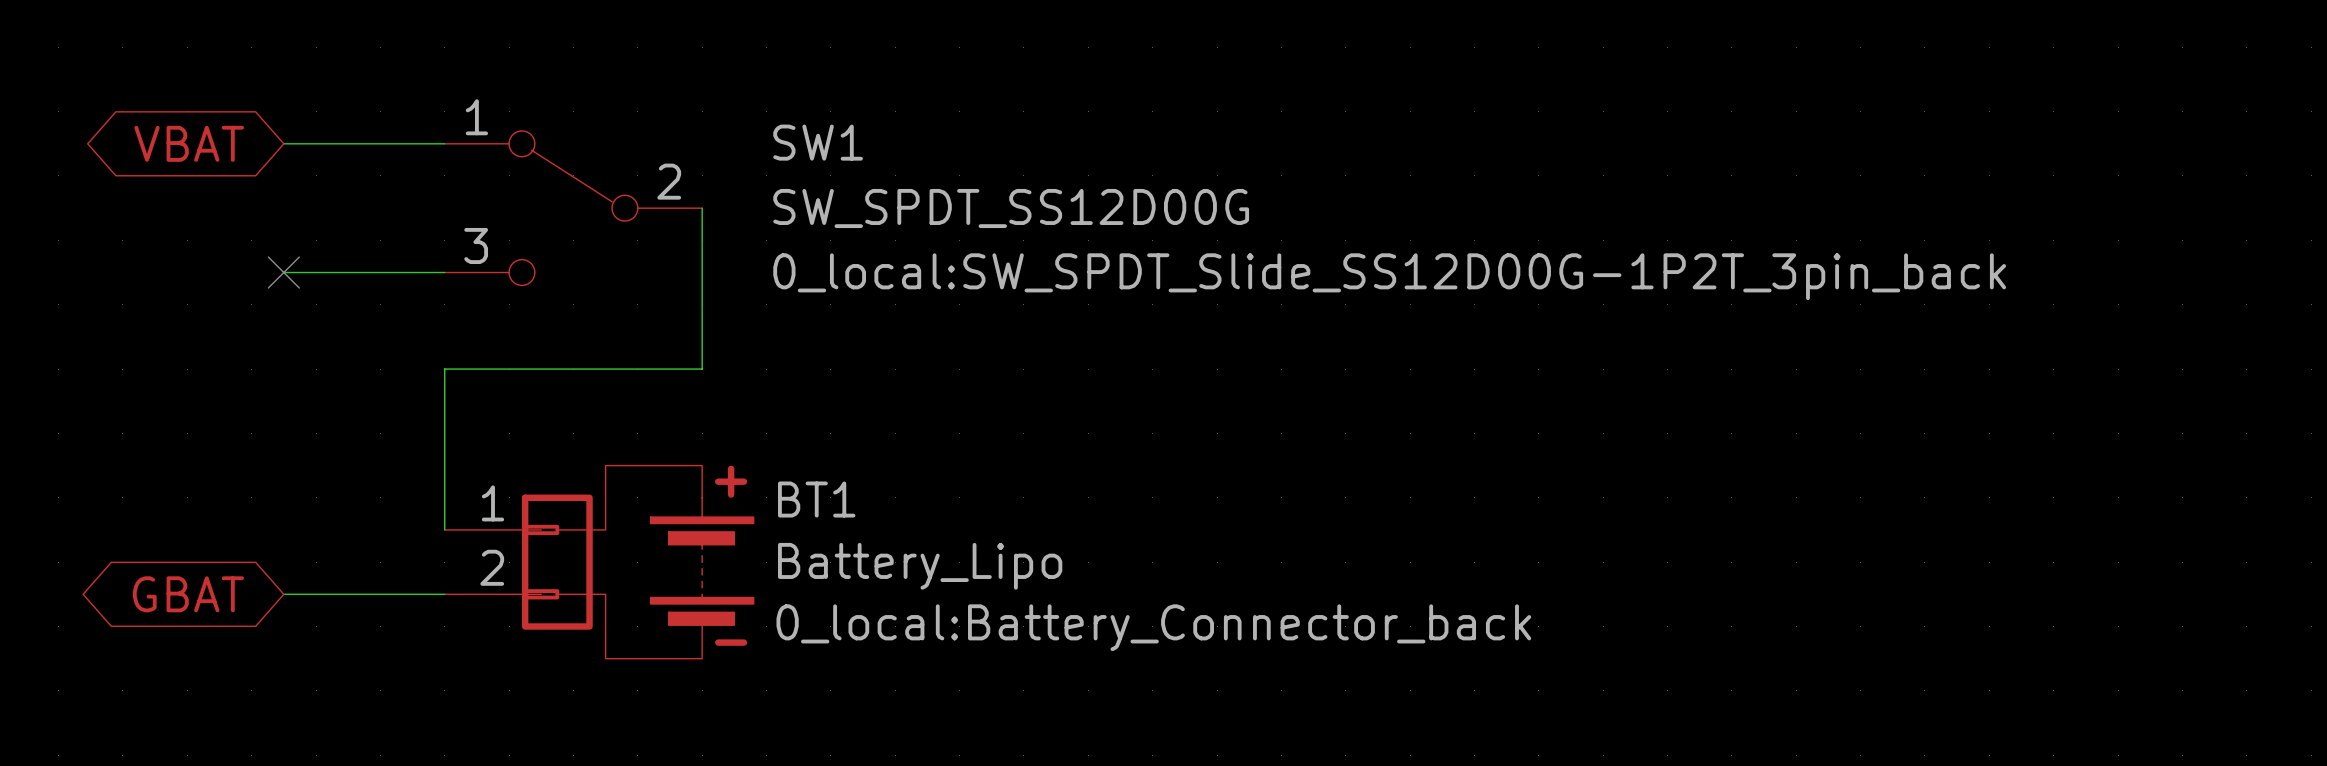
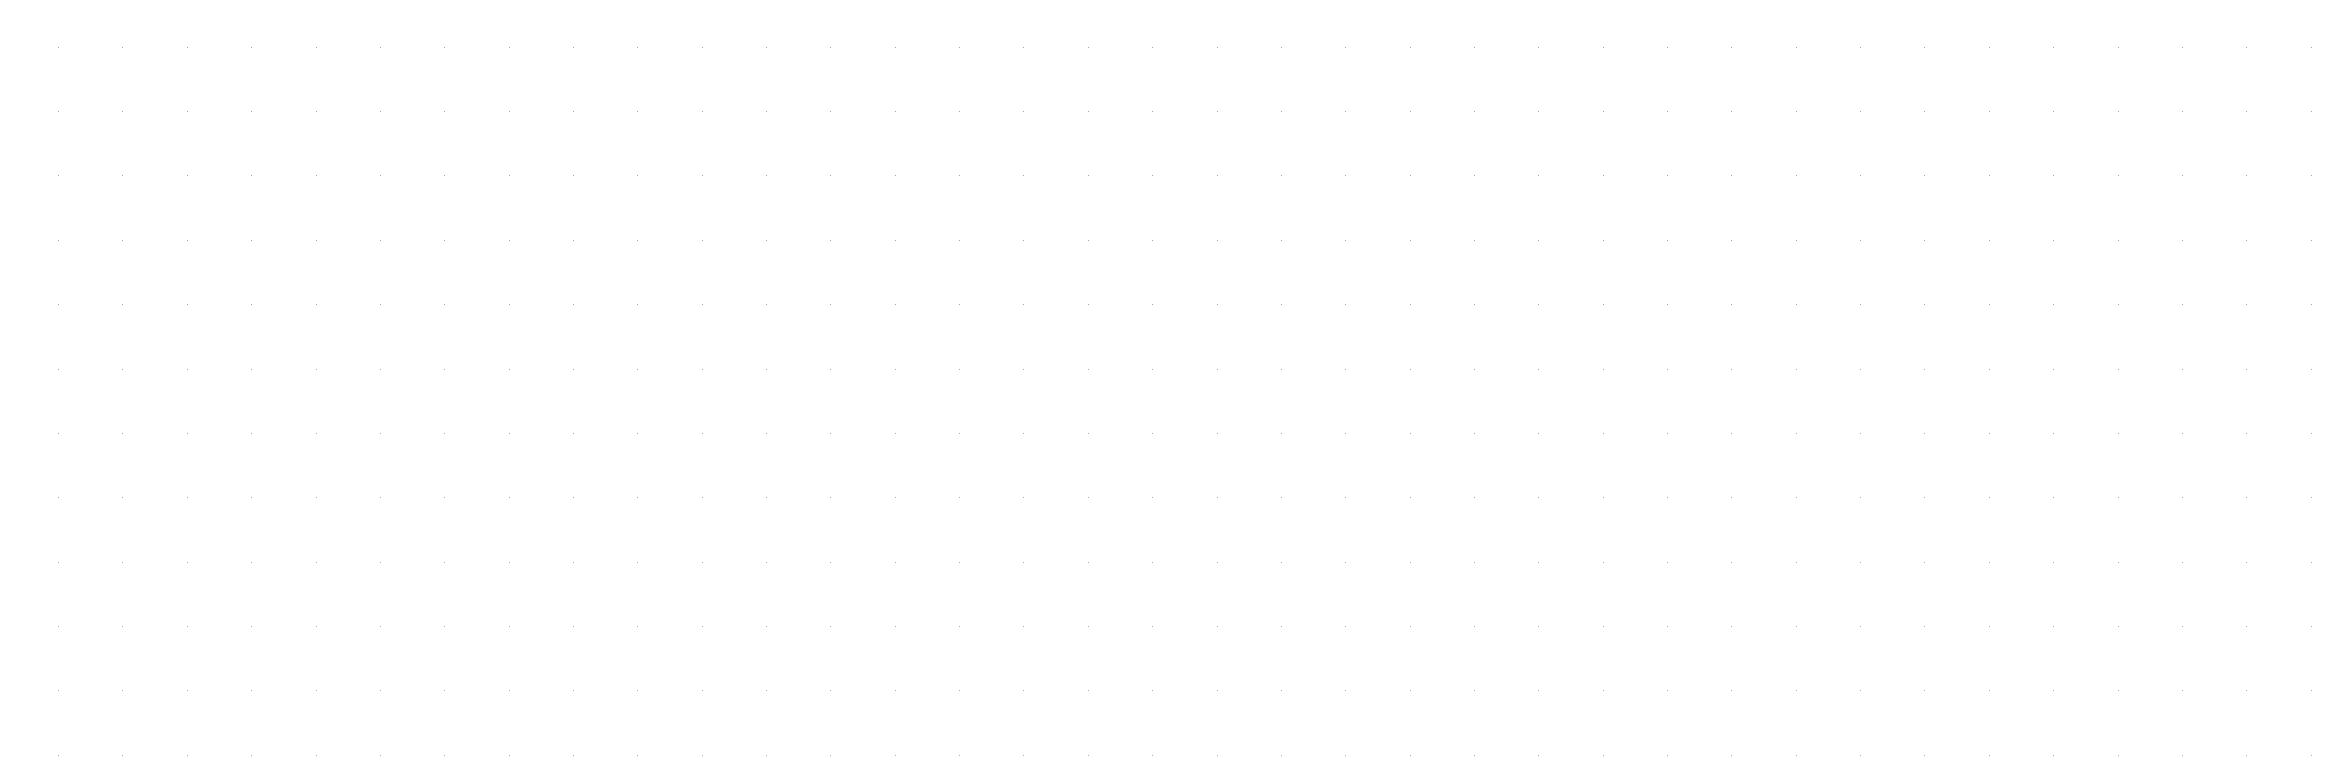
global label: VBAT (189, 143) -> none
wire: (283, 143) (444, 143) -> none
SW1: SW_SPDT_SS12D00G (573, 208) -> none
wire: (702, 208) (702, 369) (444, 369) (444, 529) -> none
wire: (283, 272) (444, 272) -> none
no-connect mark: (283, 272) -> none
BT1: Battery_Lipo (599, 562) -> none
global label: GBAT (188, 594) -> none
wire: (283, 594) (444, 594) -> none

